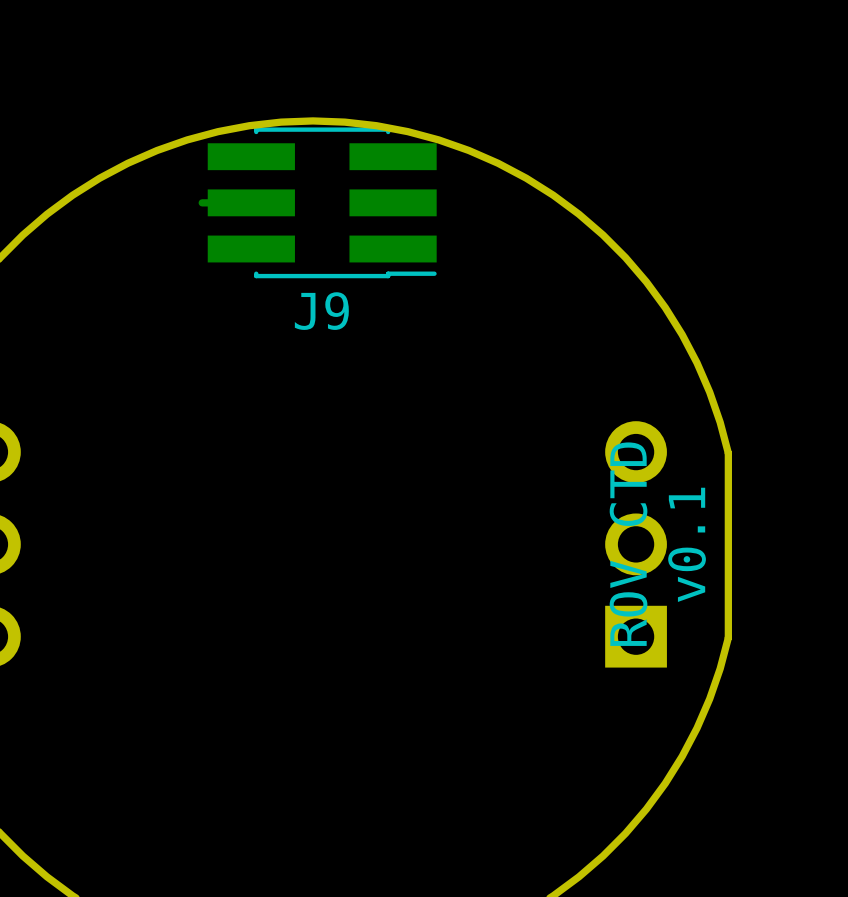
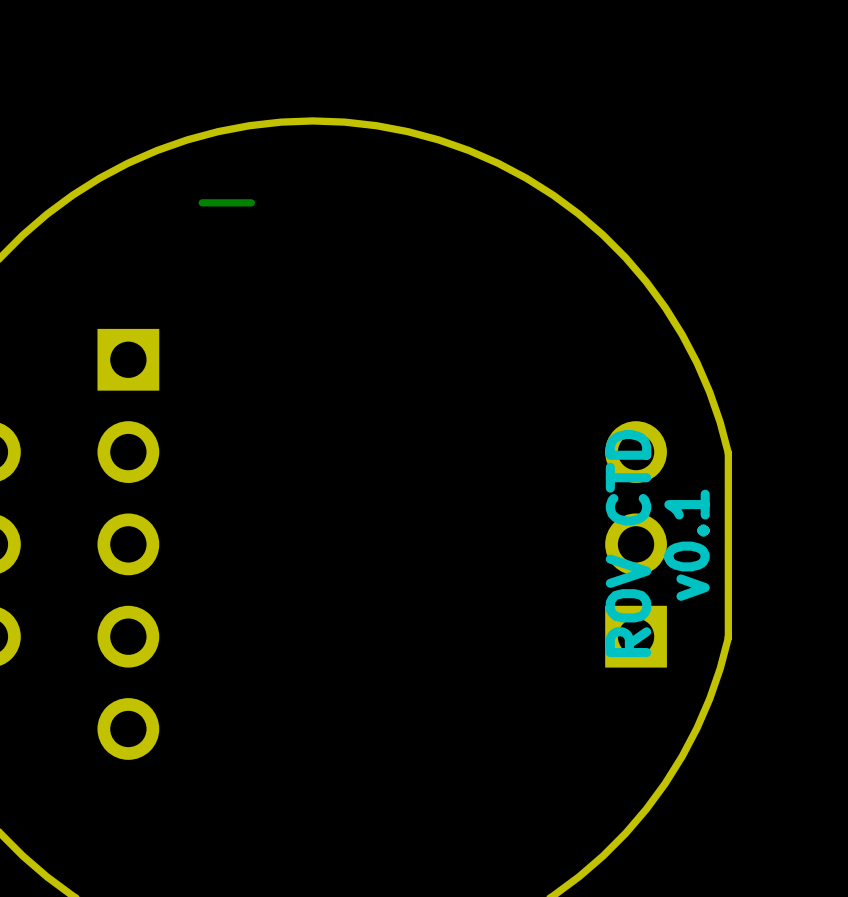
J9: (322, 202) -> none
part: none -> (128, 544)

